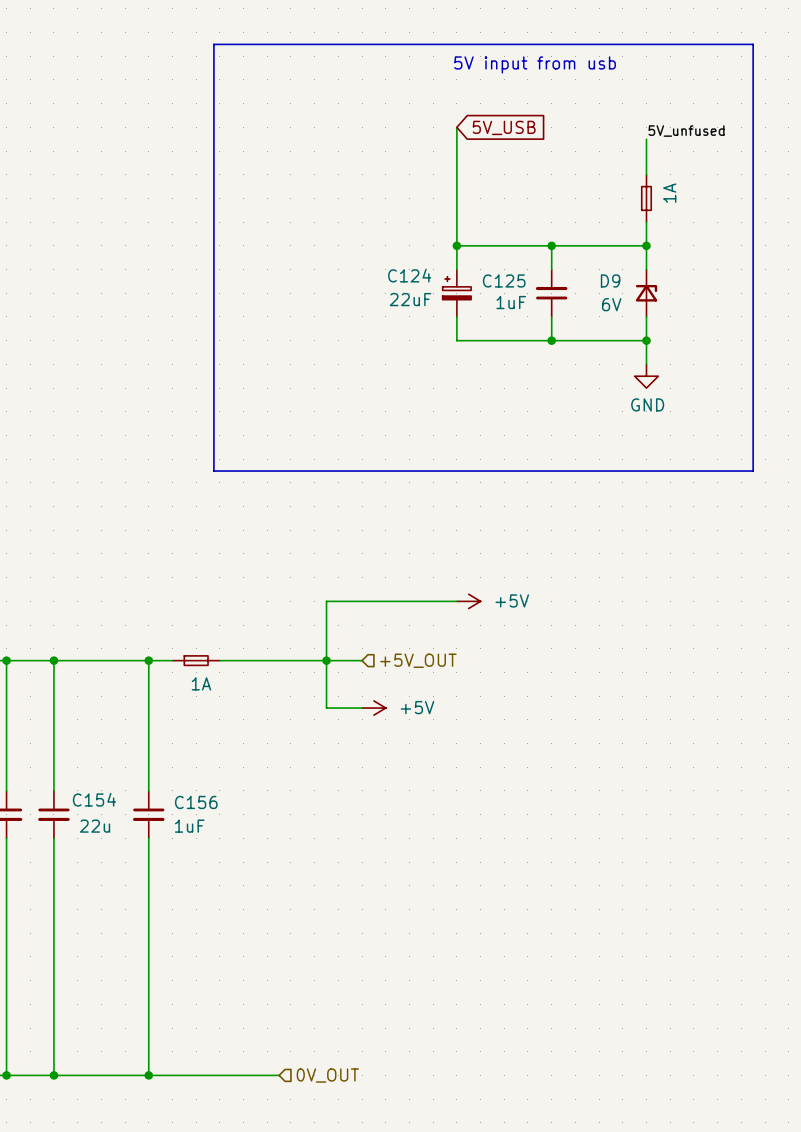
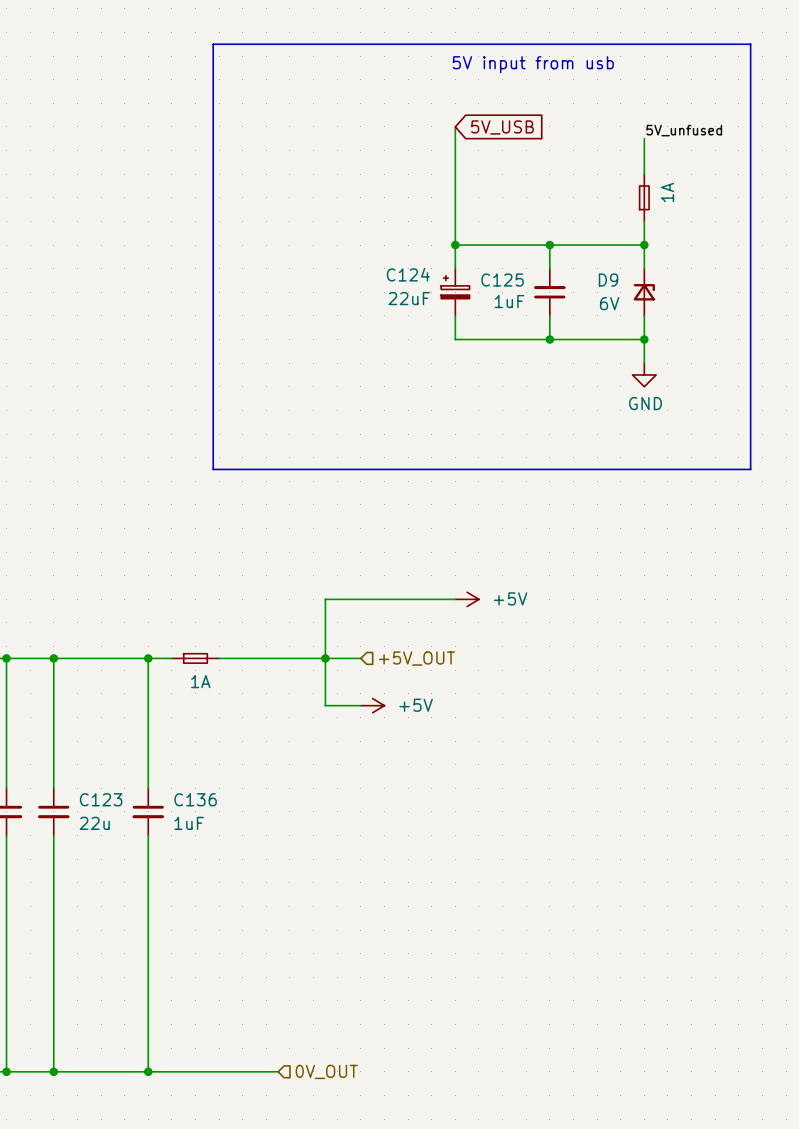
C154 name: C154 (94, 799) -> C123 (101, 799)
C156 name: C156 (196, 802) -> C136 (195, 799)

